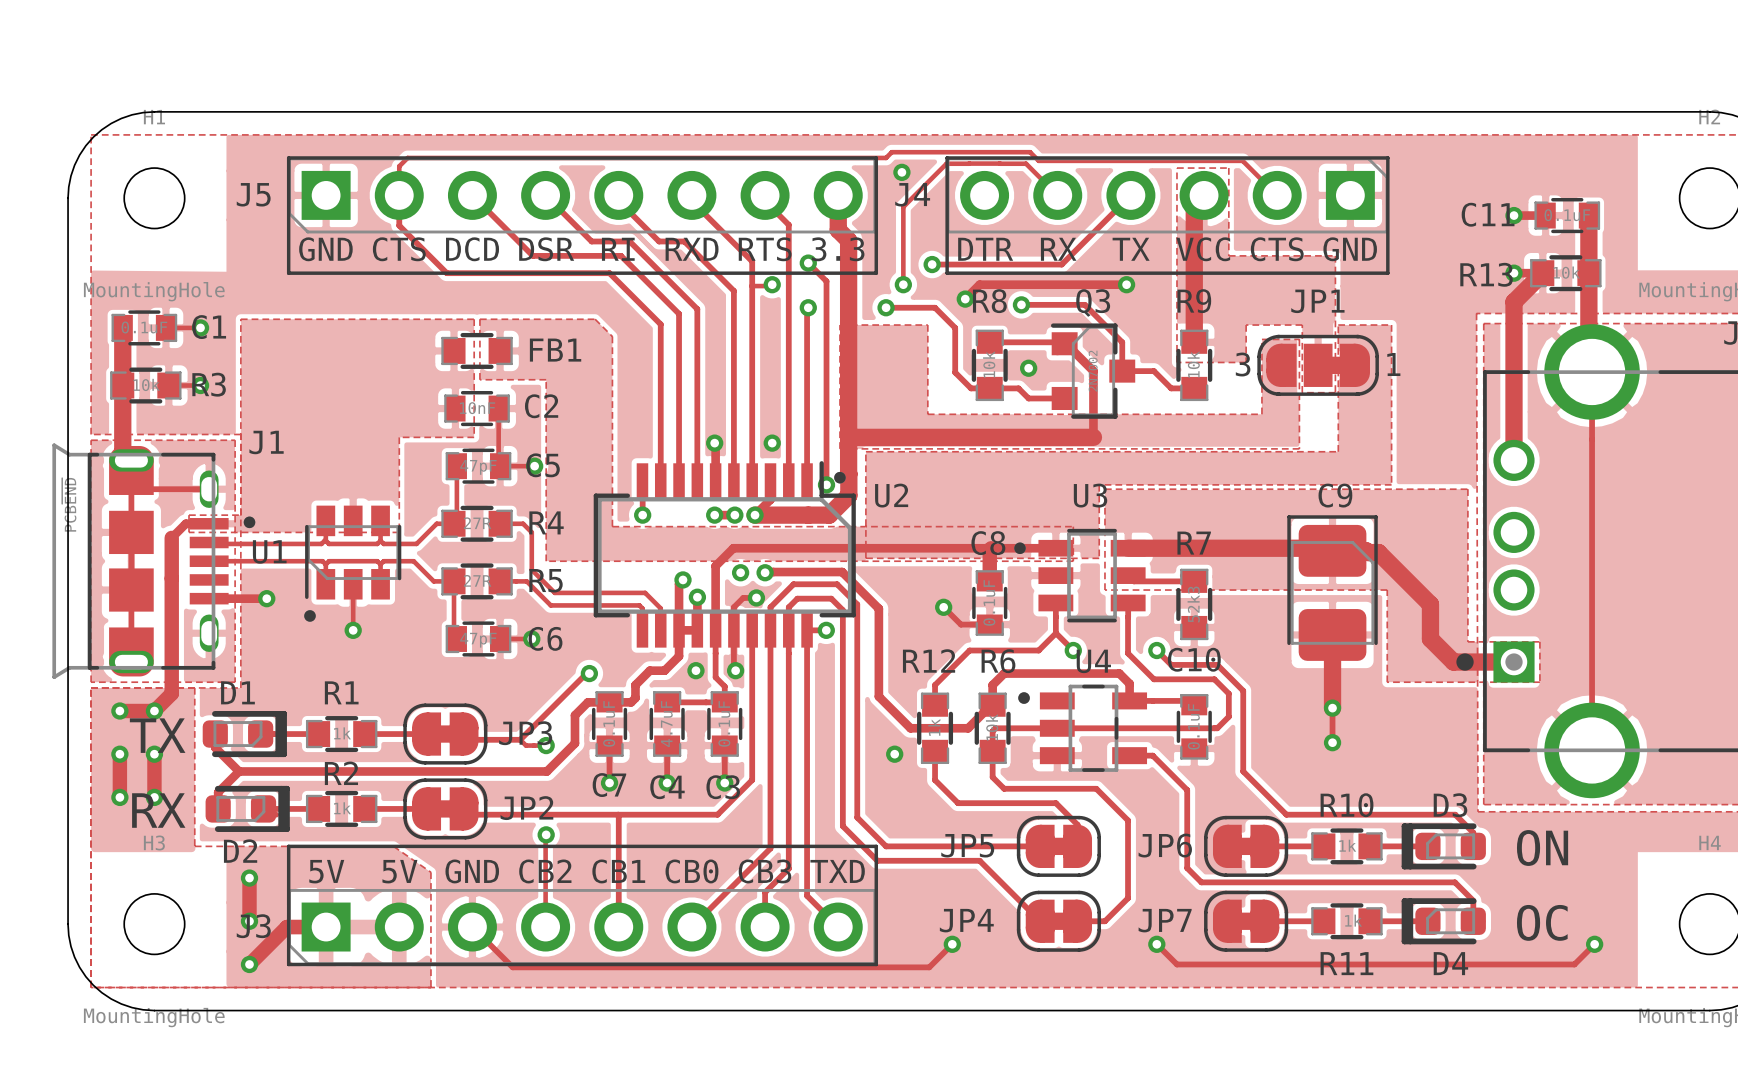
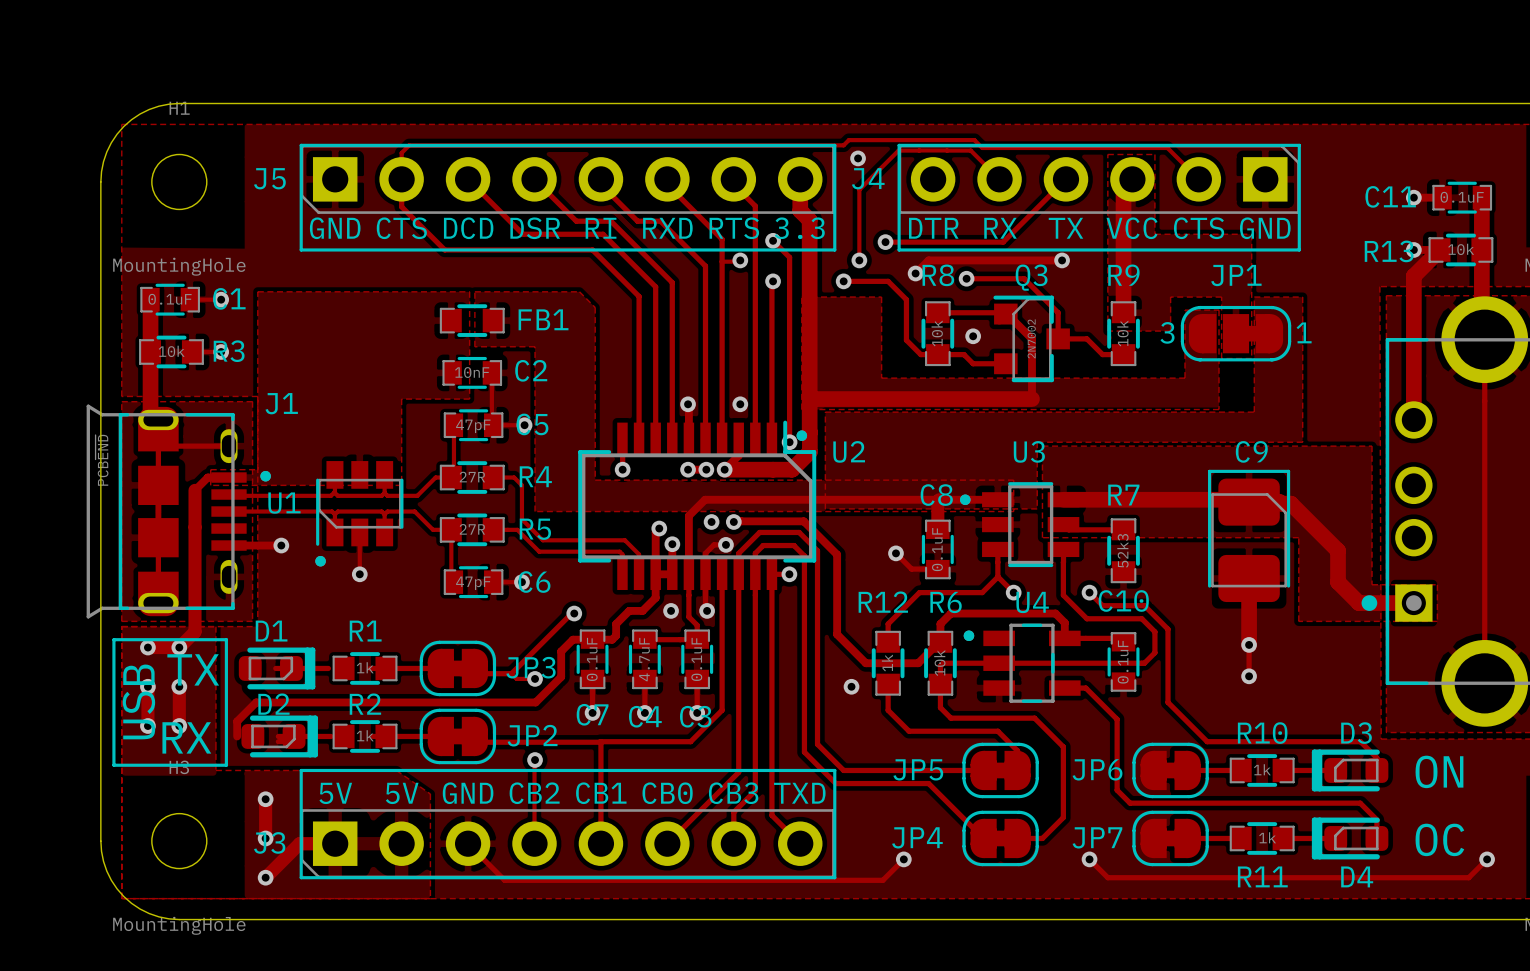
line: none -> (113, 639) (113, 765) (226, 765) (226, 639) (113, 639)
track: (215, 734) (215, 747) (239, 771) -> none
D1 position: (244, 734) -> (277, 668)
R1 position: (341, 734) -> (365, 668)
JP3 position: (445, 734) -> (457, 668)
text position: TX (157, 735) -> TX (193, 669)
text: none -> USB (138, 701)
D2 position: (247, 808) -> (279, 736)
R2 position: (341, 808) -> (365, 736)
JP2 position: (445, 808) -> (457, 736)
text position: RX (158, 810) -> RX (186, 737)
track: (464, 814) (618, 814) -> (474, 736) (480, 742) (600, 742)
D2 name position: D2 (240, 851) -> D2 (273, 704)

